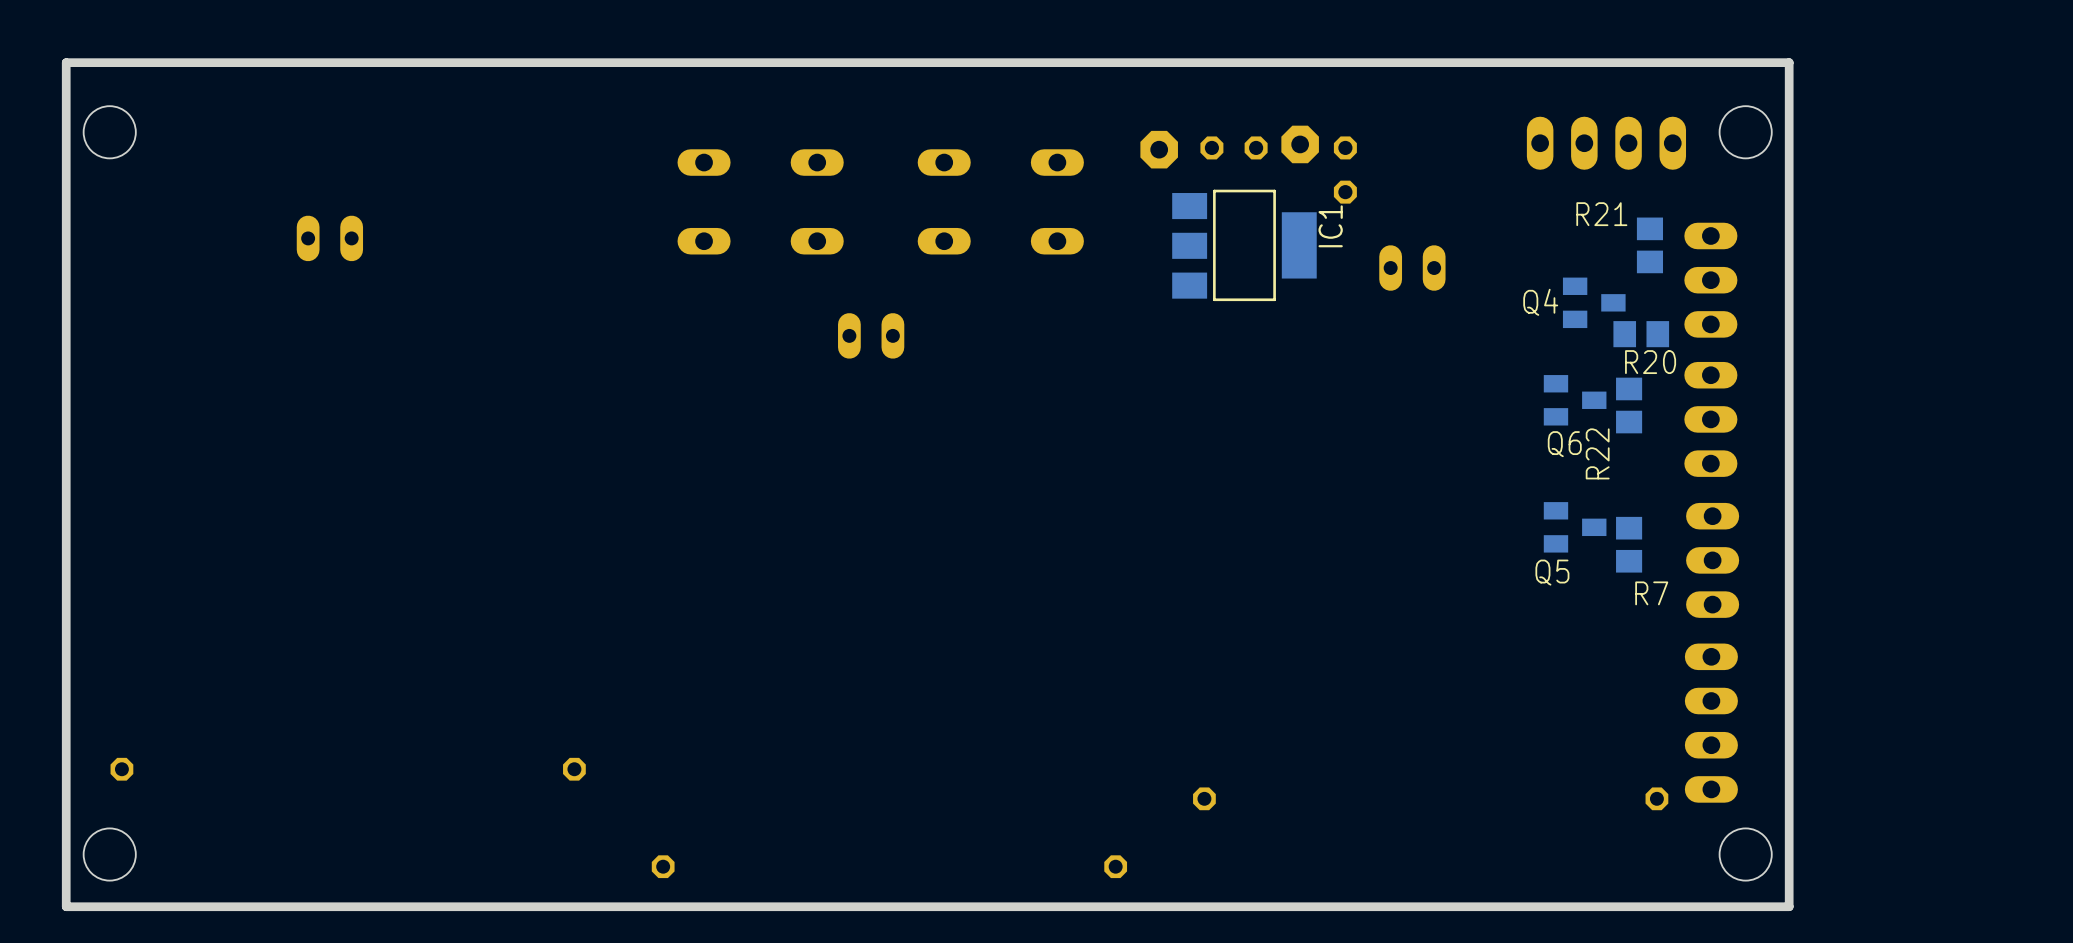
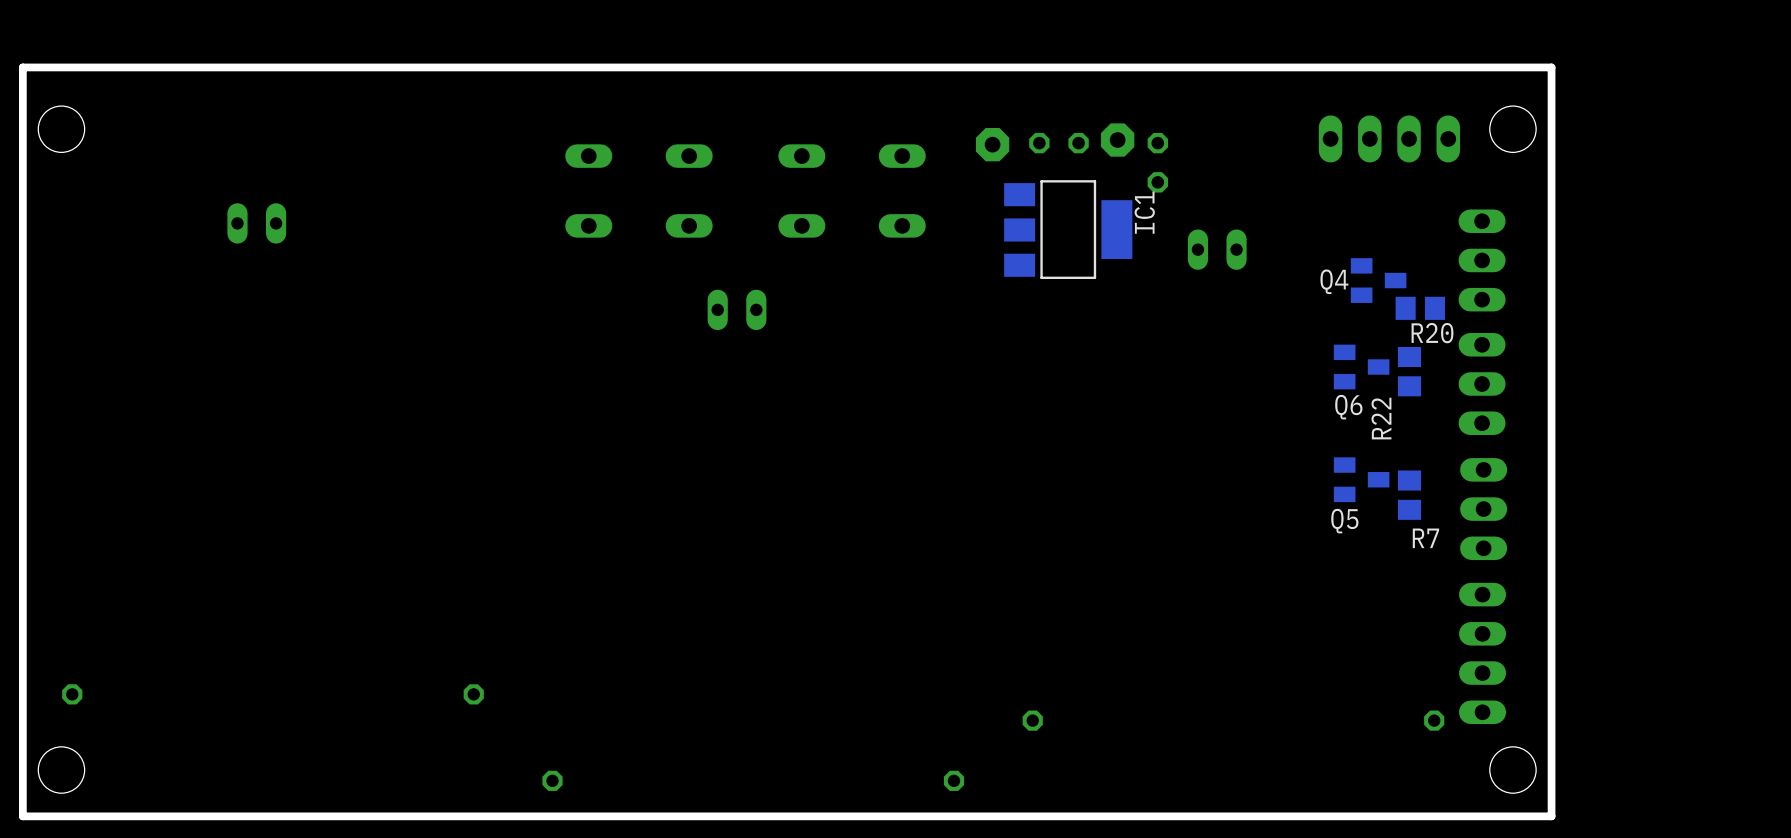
R21: (1649, 245) -> none

